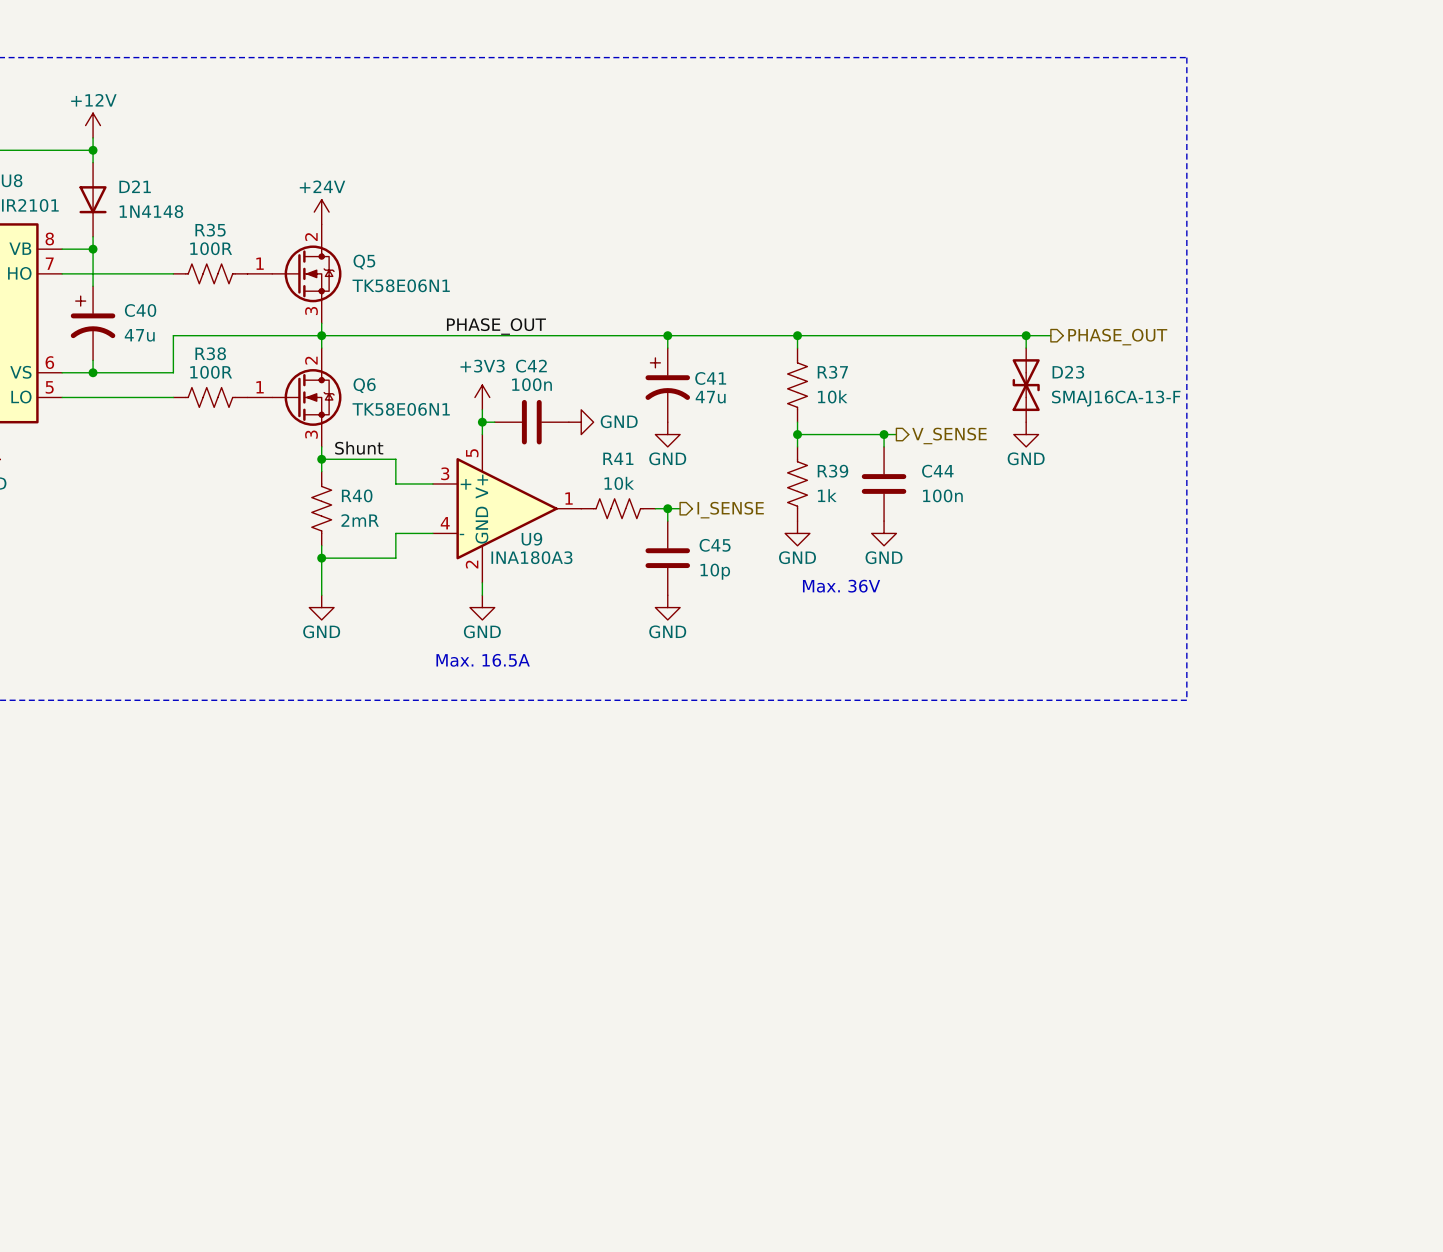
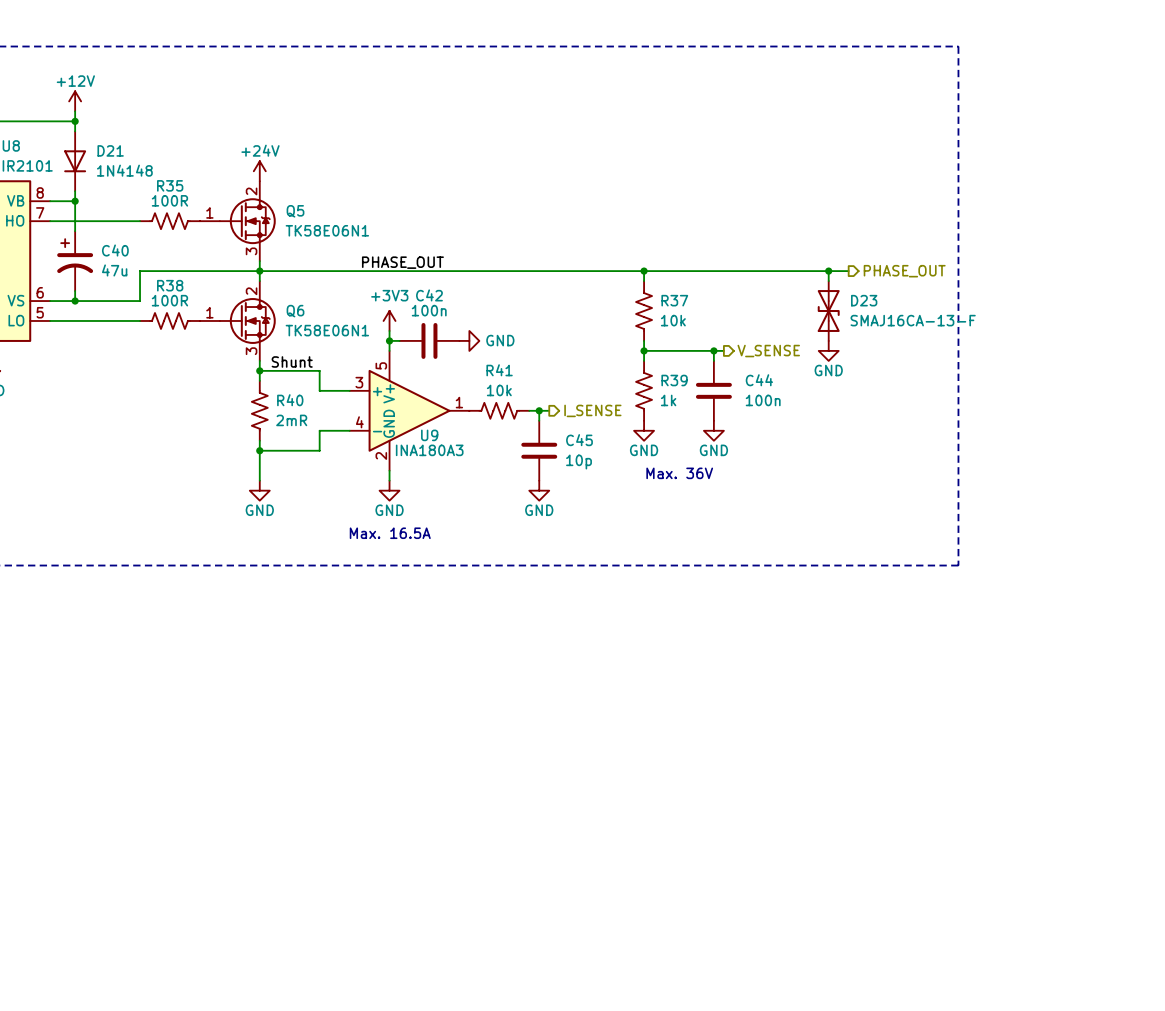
wire: (667, 335) (667, 348) -> none
junction: (667, 335) -> none
C41: 47u (667, 385) -> none
power symbol: GND (667, 434) -> none

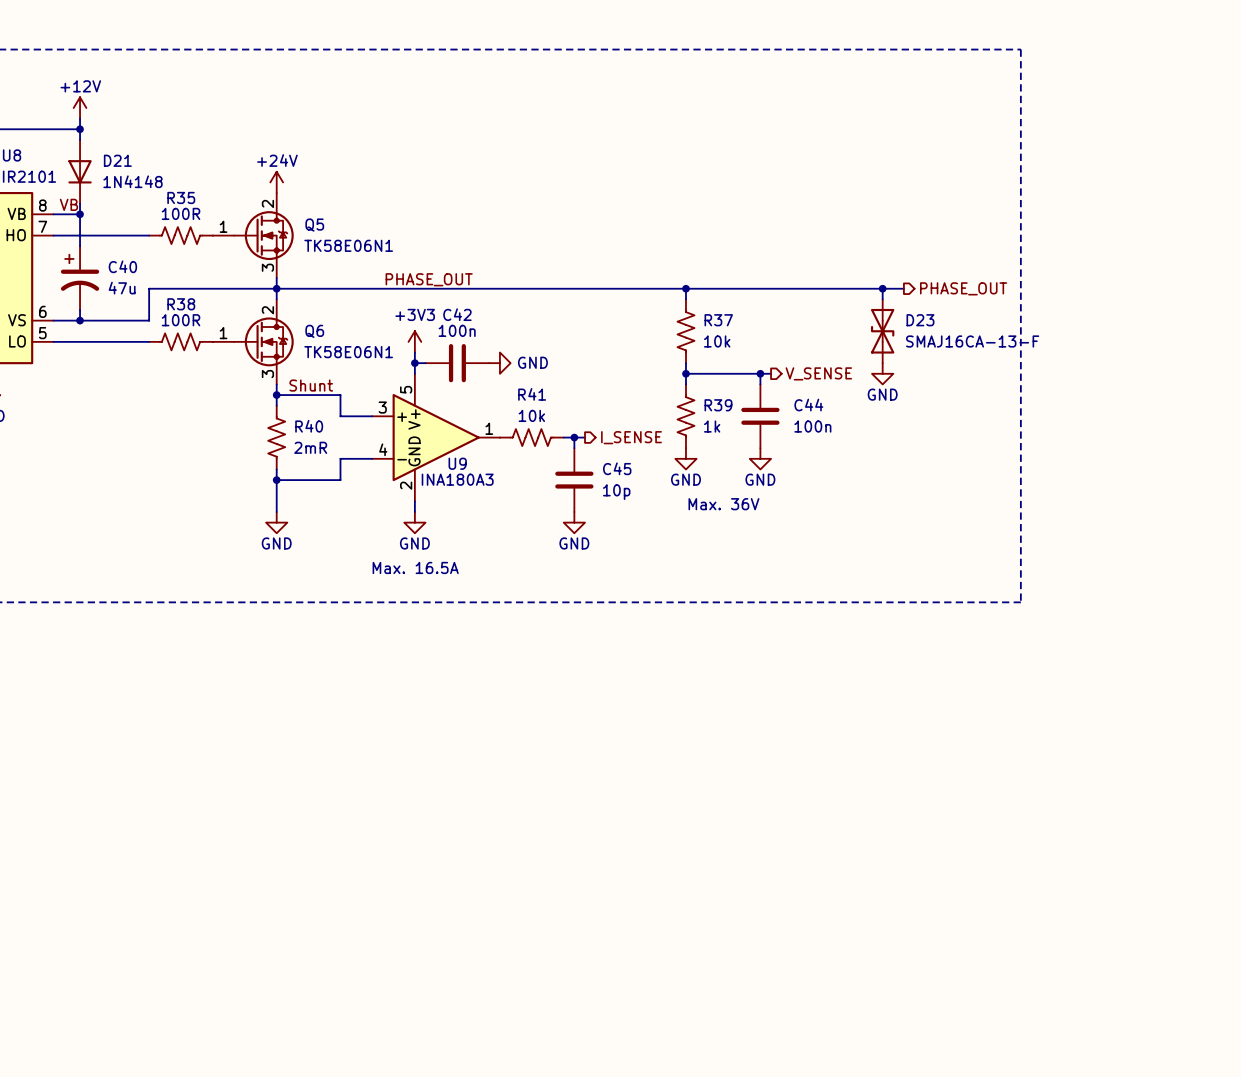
label: none -> VB (68, 204)

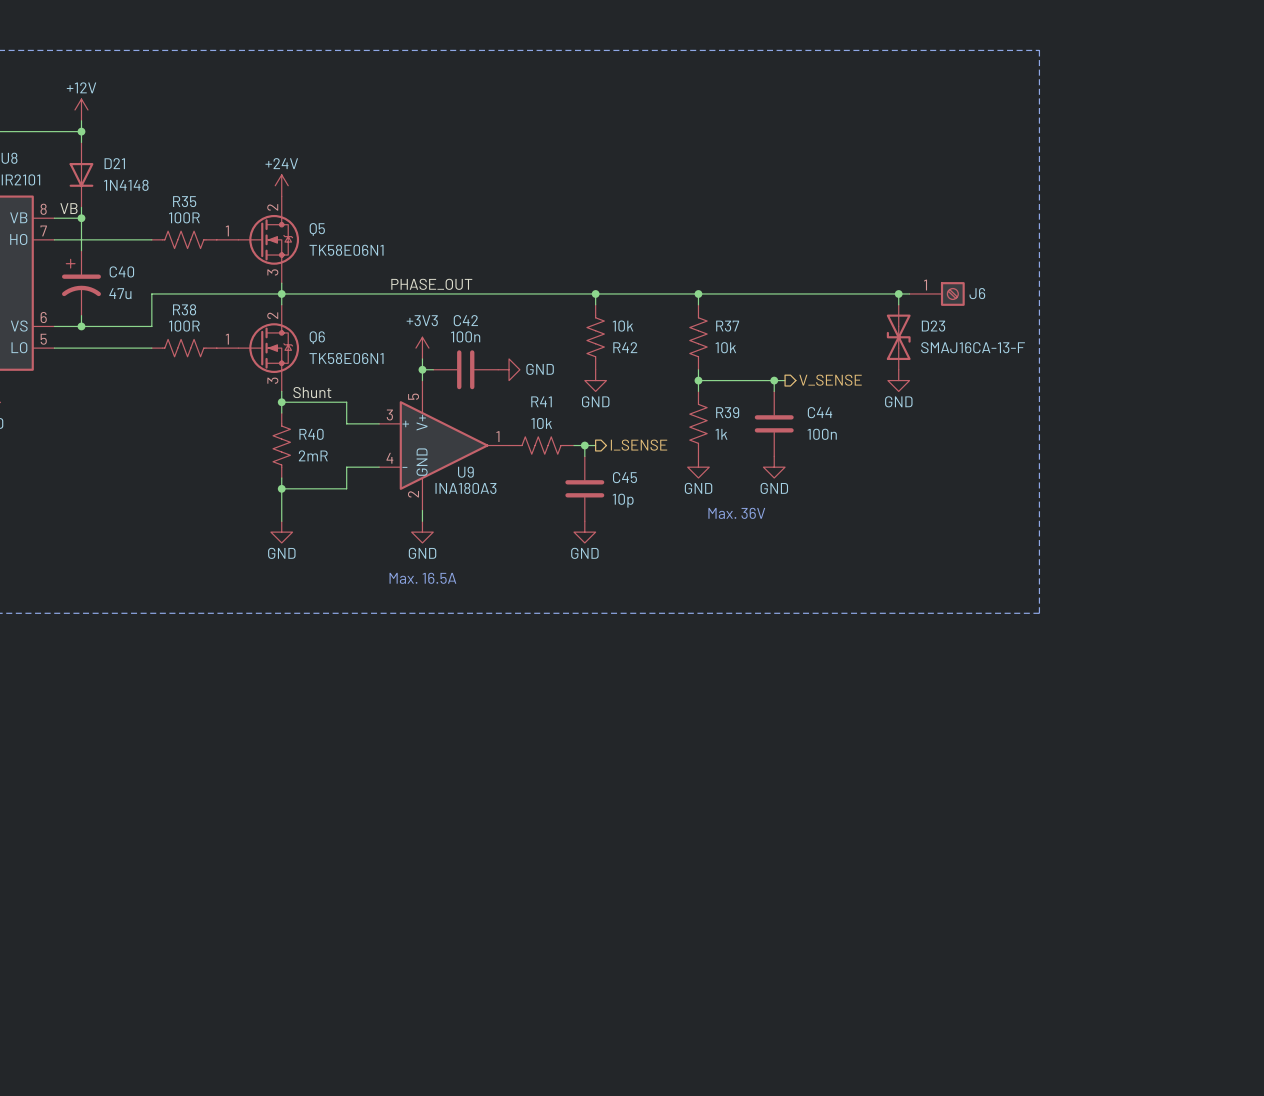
wire: none -> (595, 293) (595, 304)
junction: none -> (595, 293)
J6: none -> (937, 293)
hierarchical label: PHASE_OUT (963, 288) -> none
R42: none -> 10k (595, 337)
power symbol: none -> GND (595, 380)

